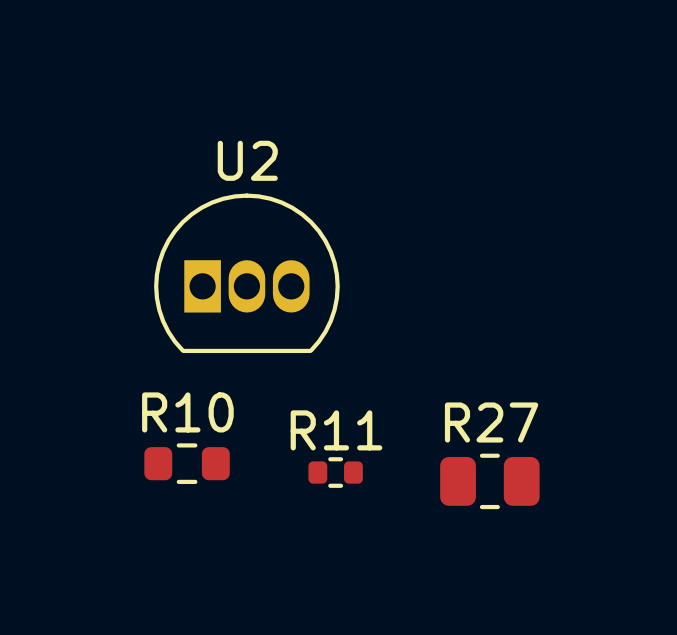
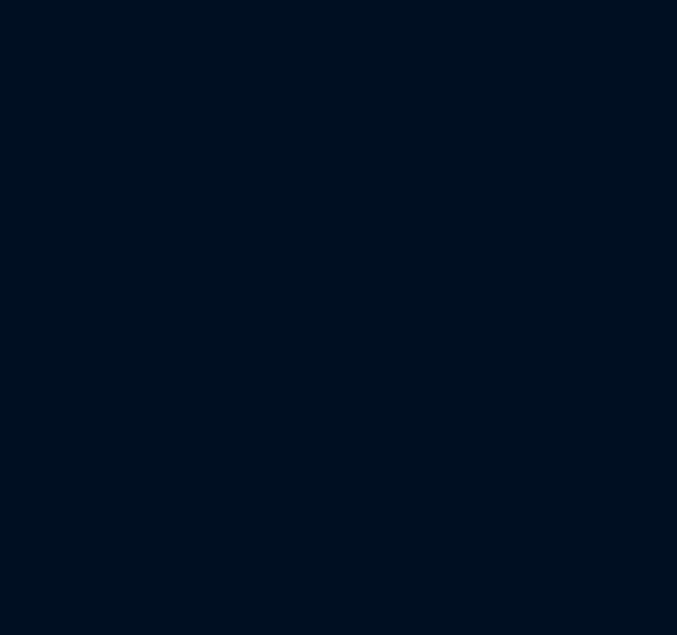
U2: (246, 273) -> none
R10: (187, 463) -> none
R11: (335, 472) -> none
R27: (489, 481) -> none

